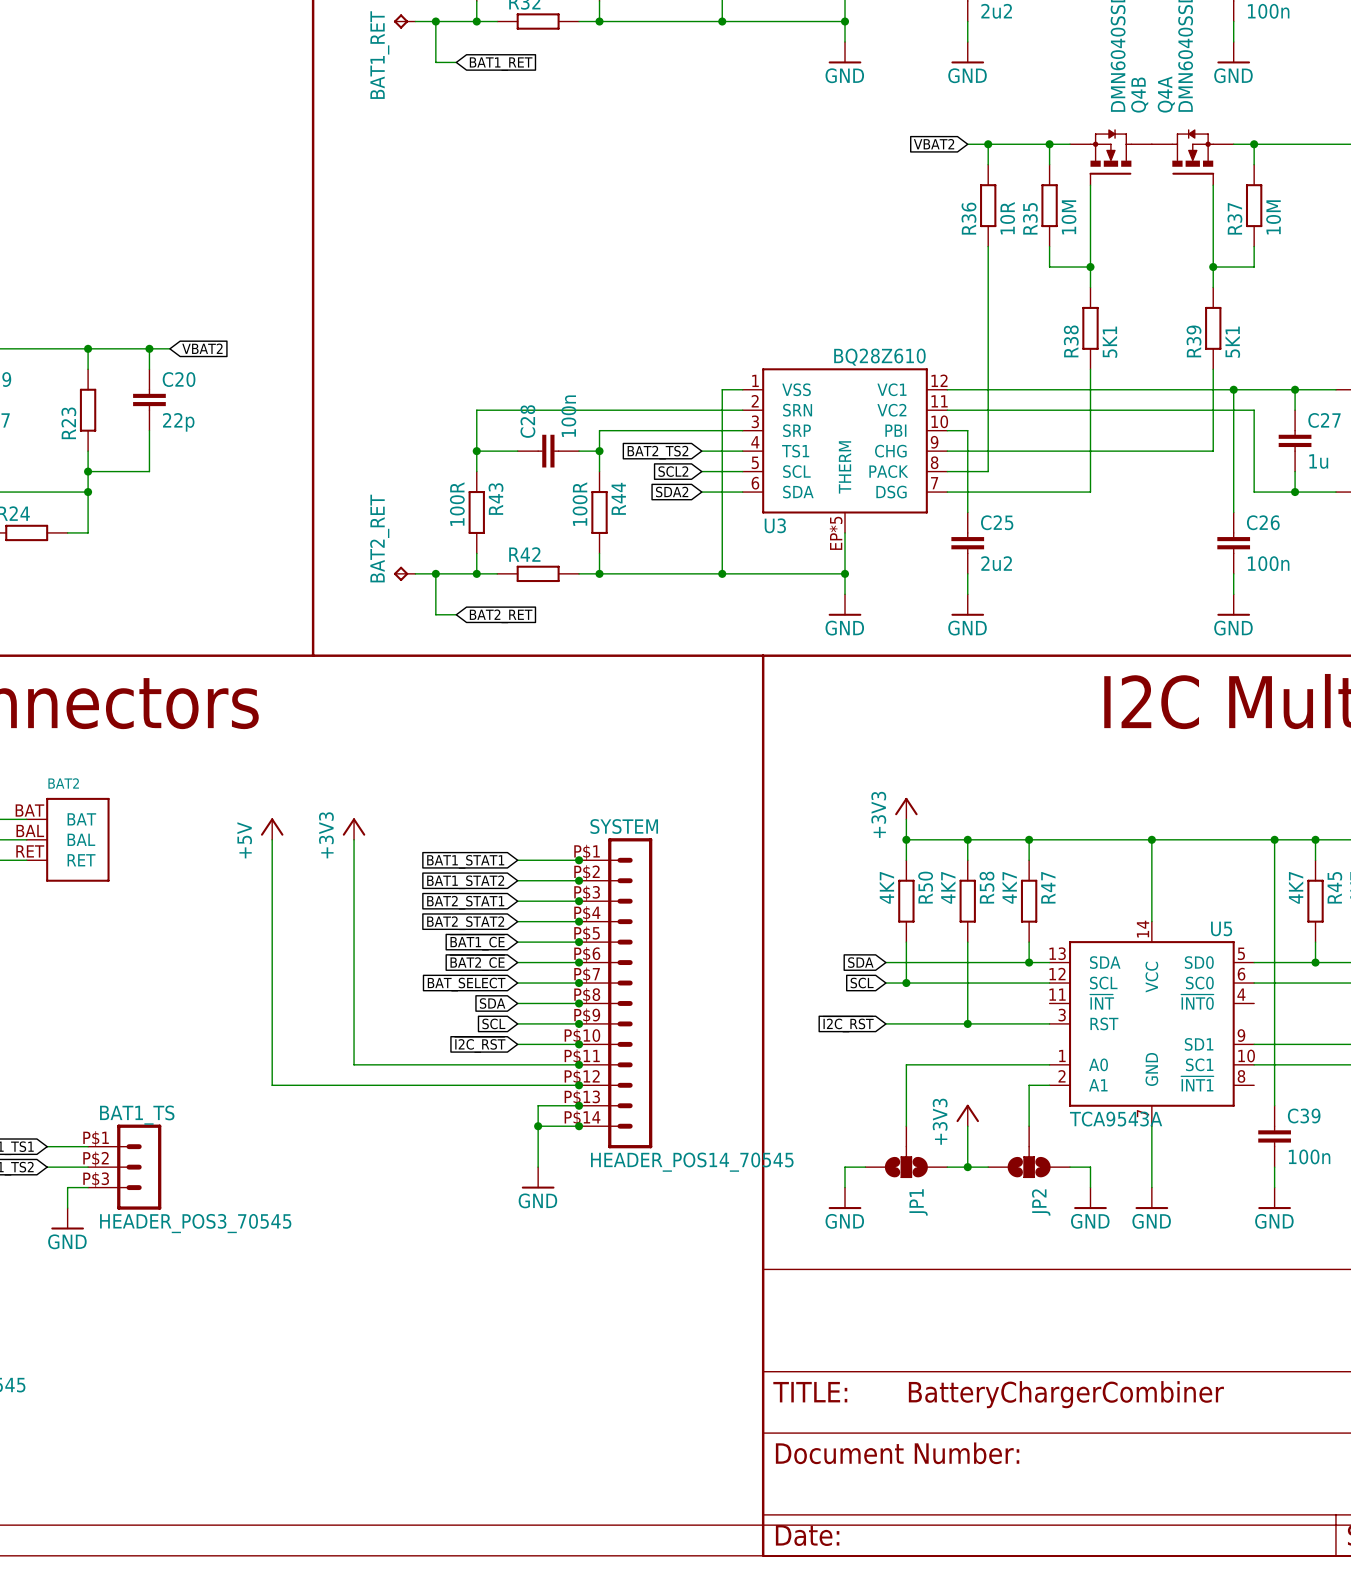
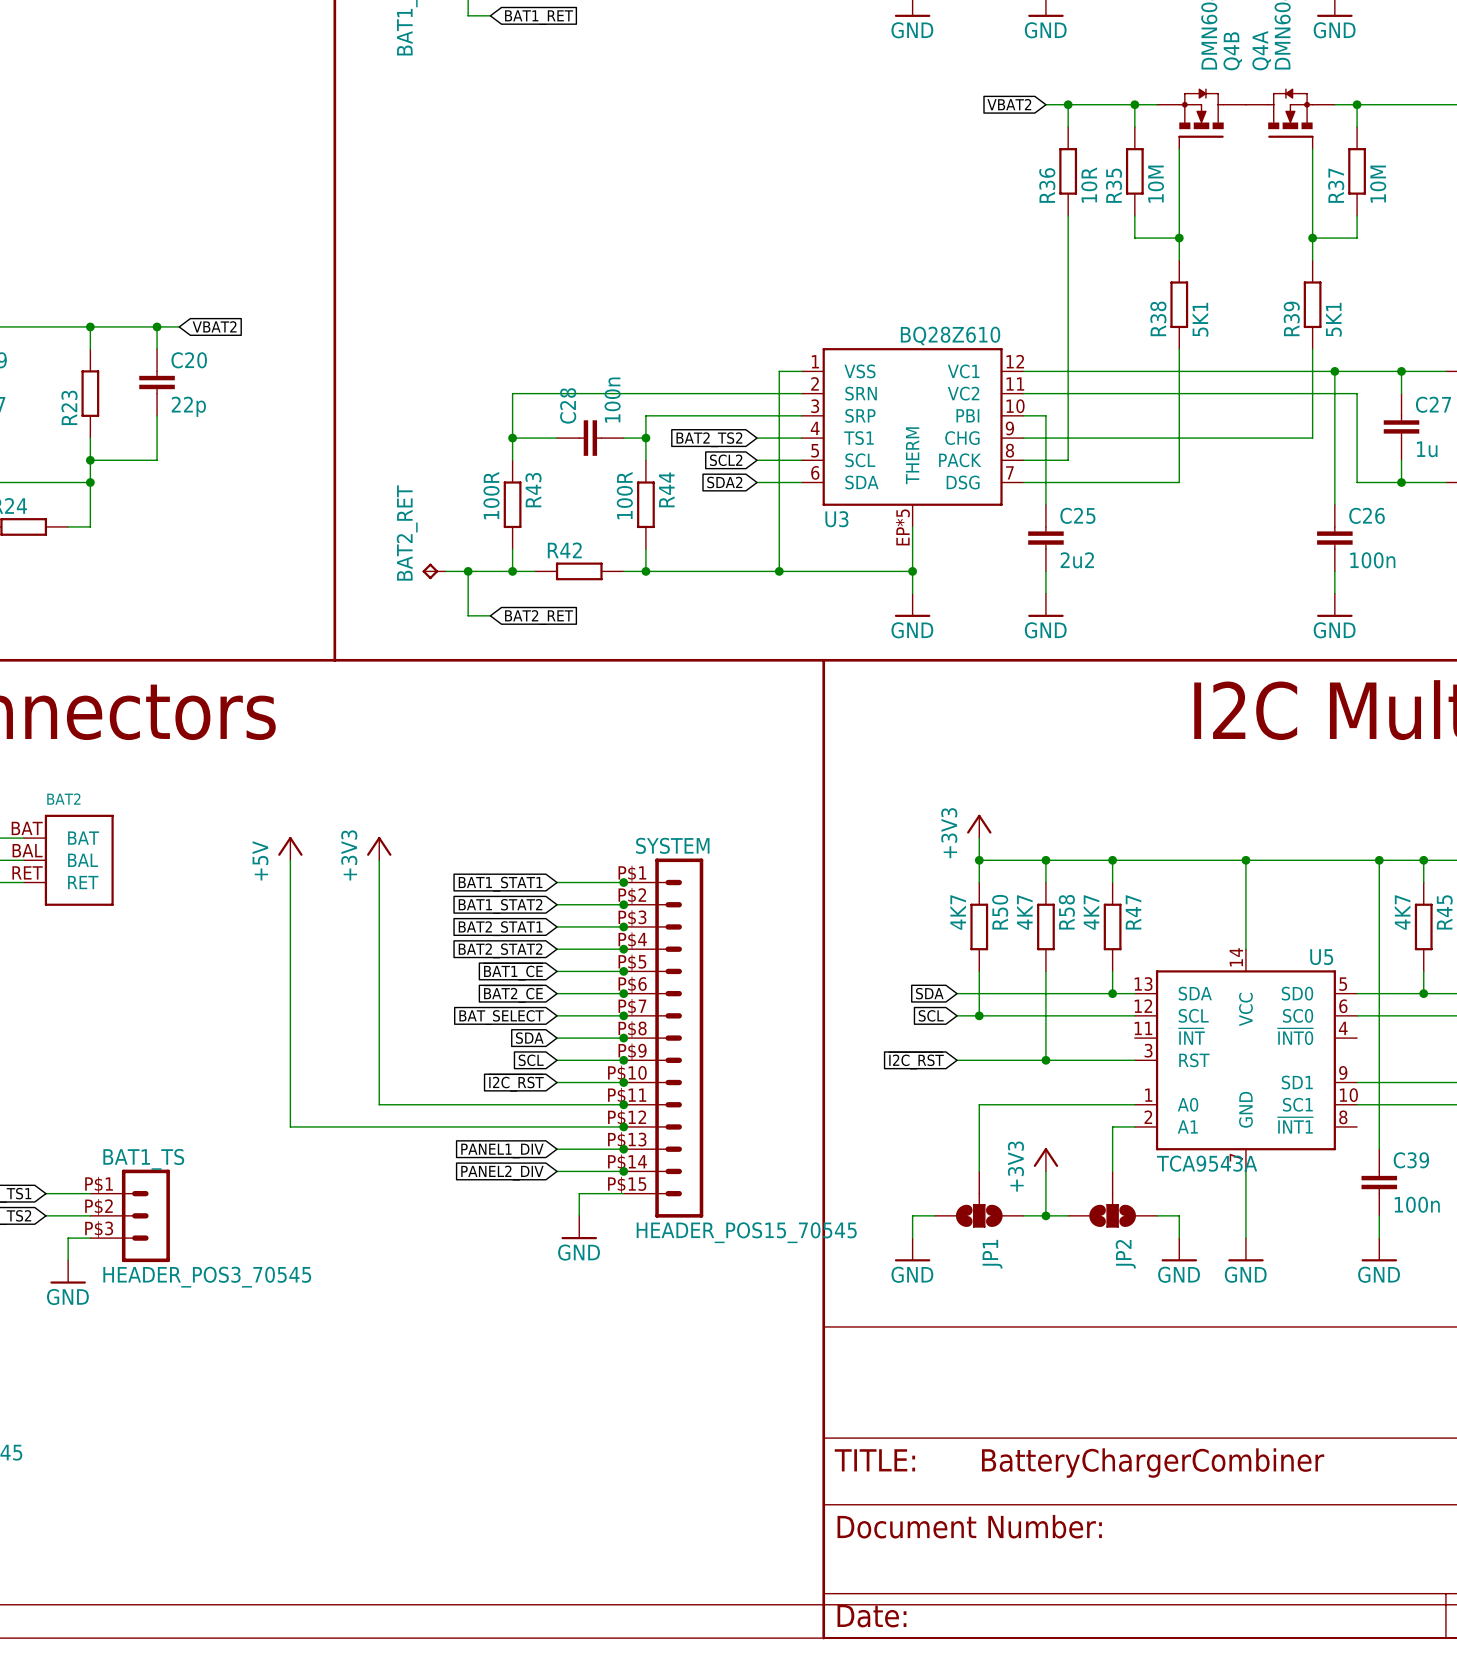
SYSTEM: HEADER_POS14_70545 (615, 993) -> none
SYSTEM: none -> HEADER_POS15_70545 (663, 1038)
wire: (538, 1105) (538, 1146) -> (579, 1149) (557, 1149)
global label: none -> PANEL1_DIV (502, 1150)
wire: none -> (557, 1171) (579, 1171)
junction: (538, 1126) -> none
global label: none -> PANEL2_DIV (502, 1173)
wire: none -> (579, 1193) (623, 1193)

